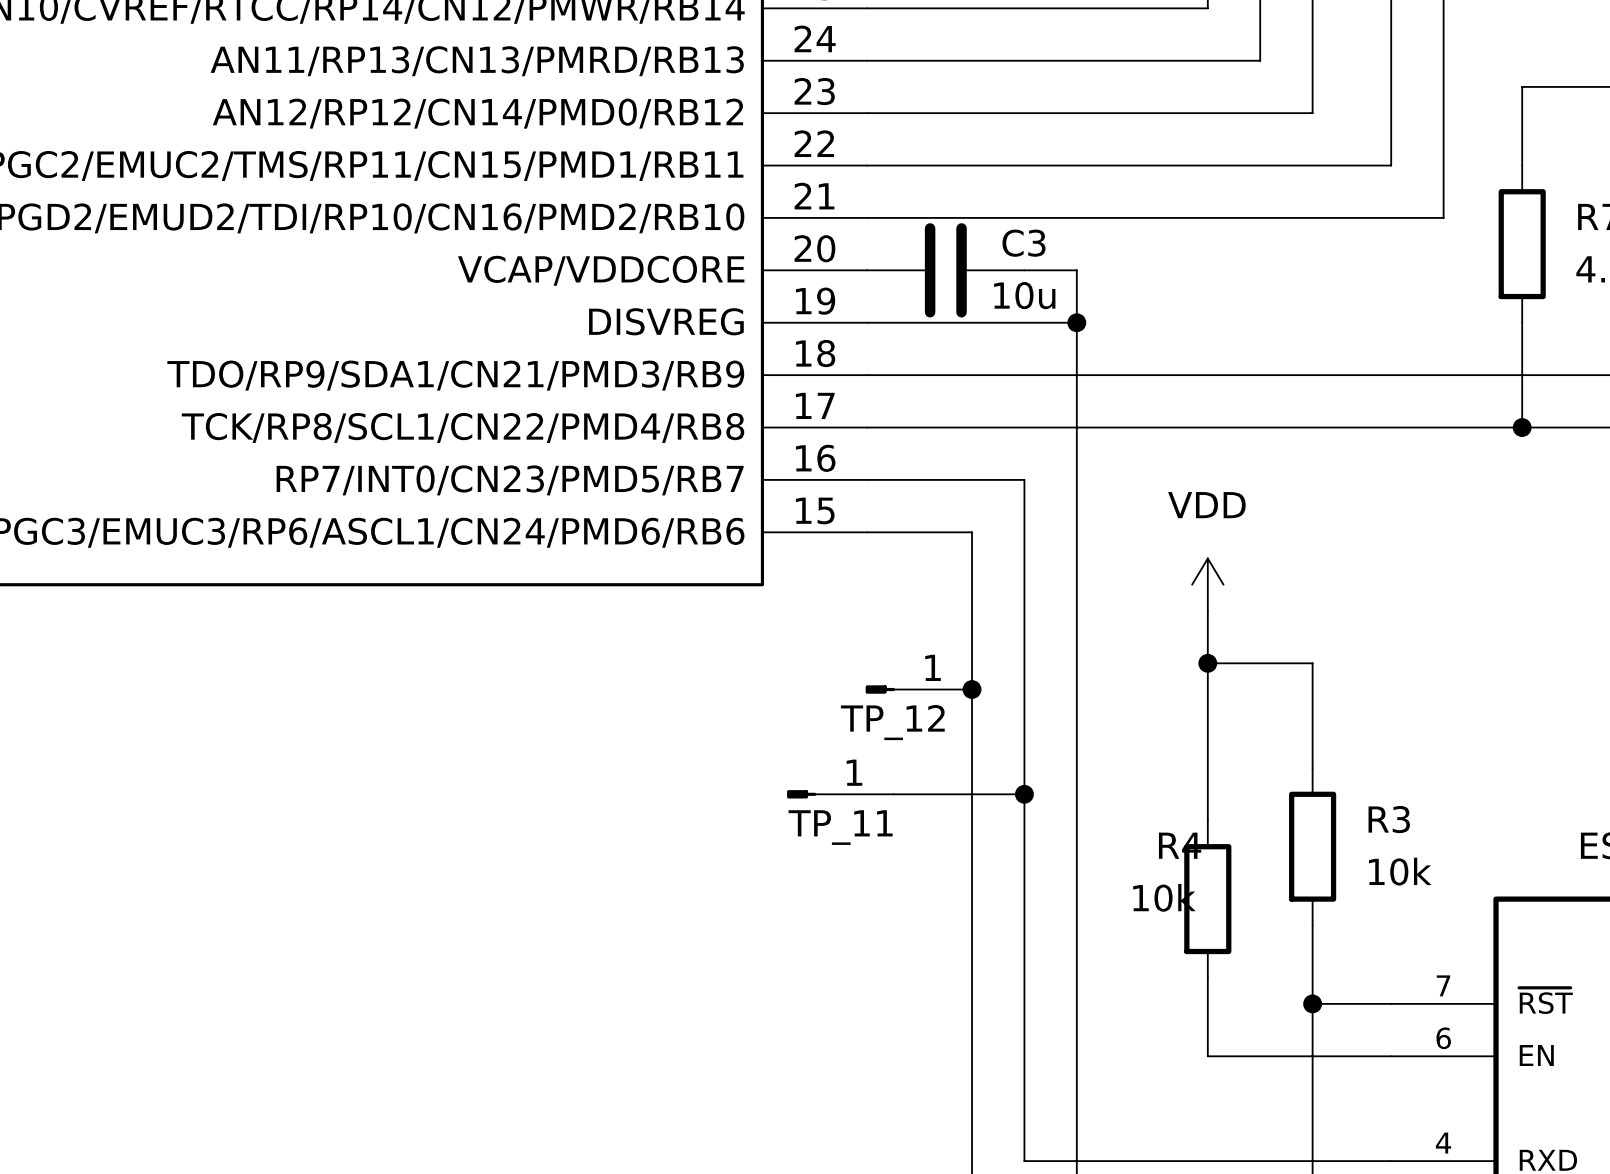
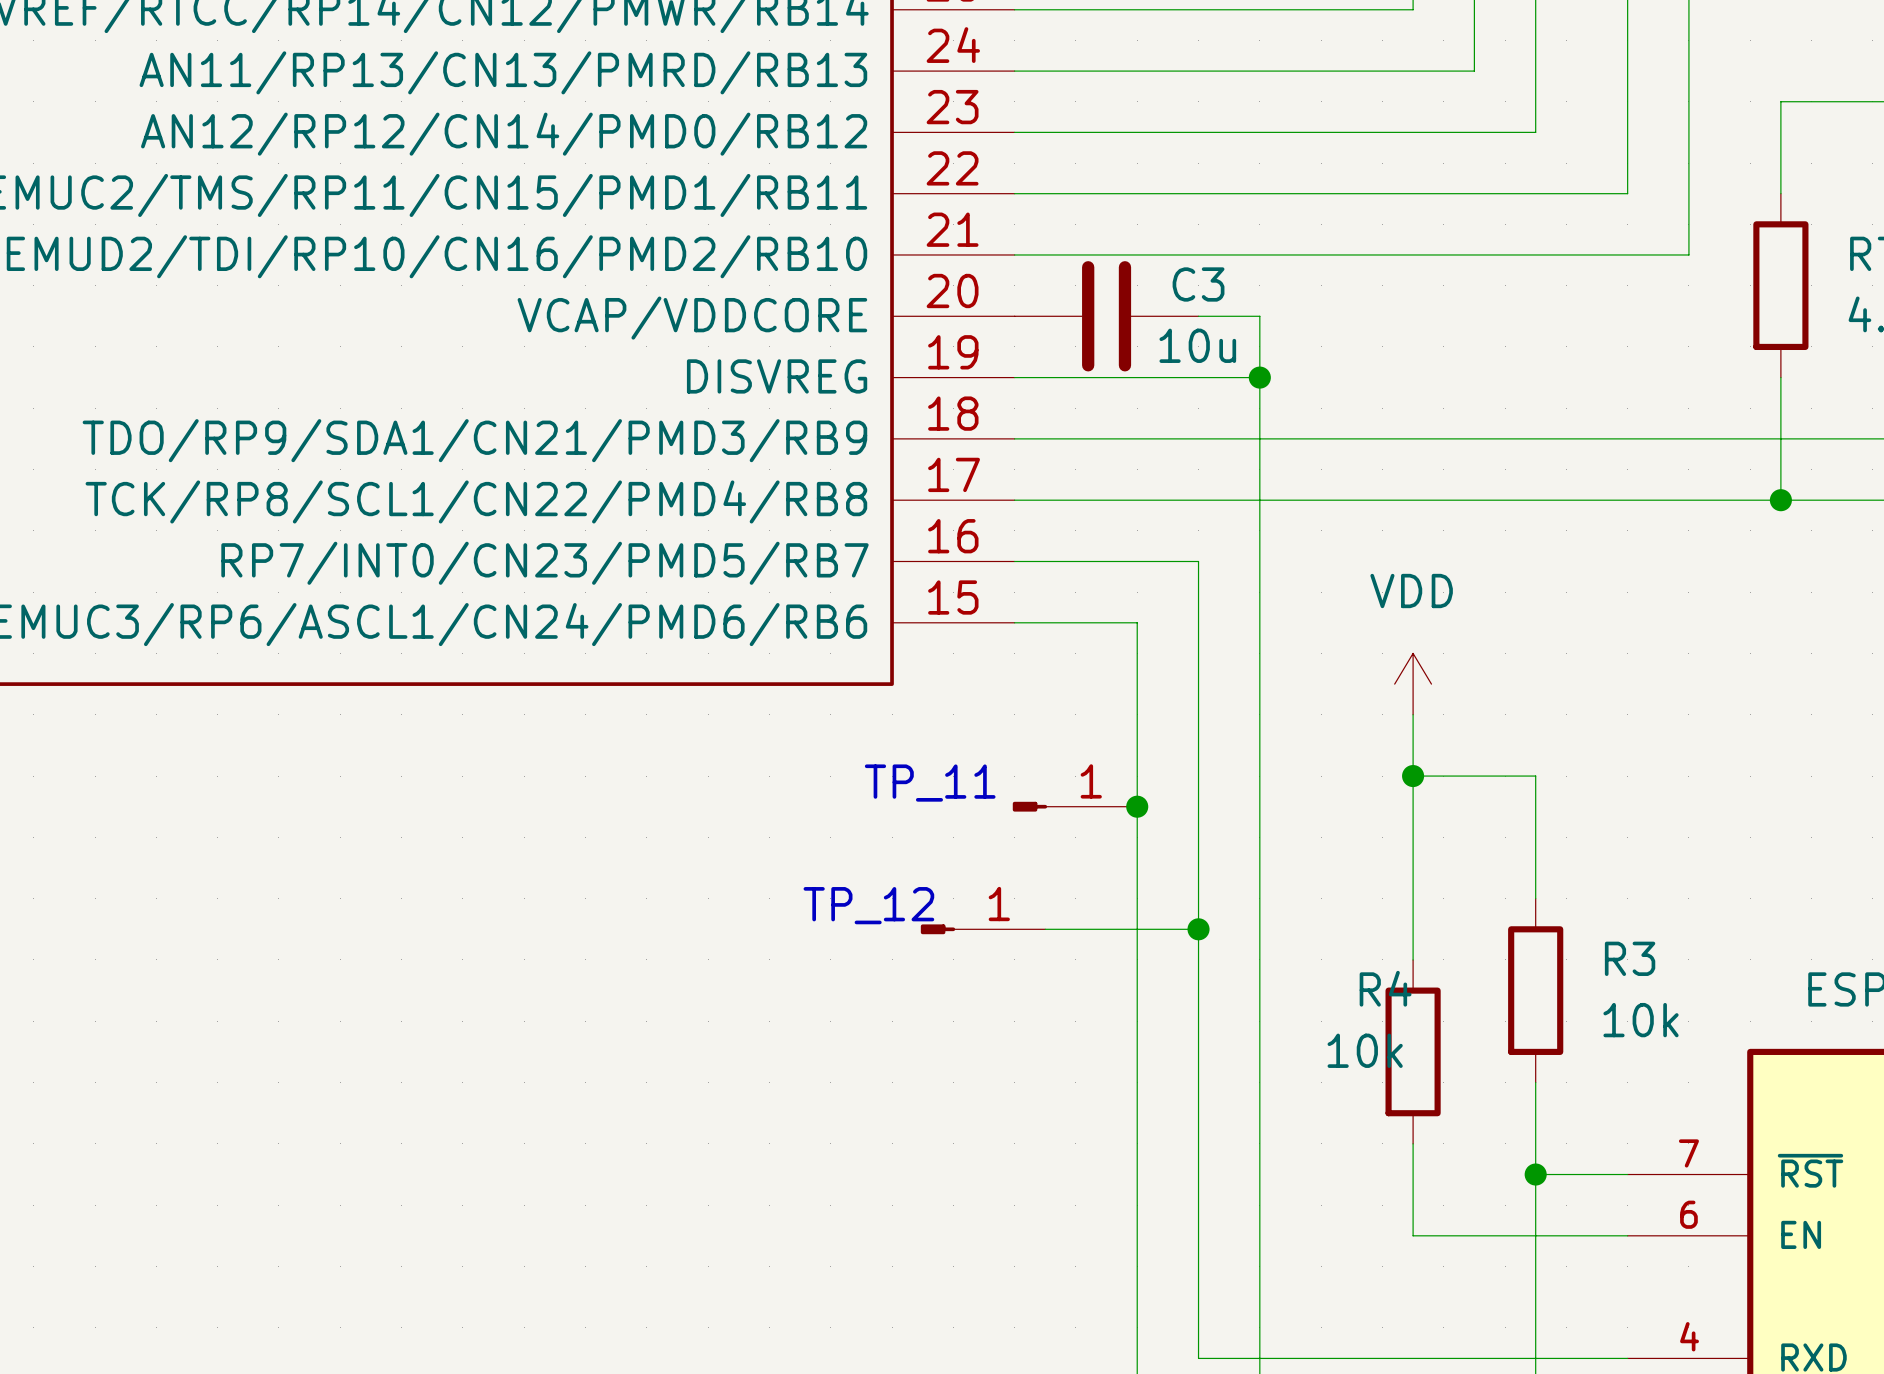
text: none -> TP_11 (930, 783)
label: TP_12 (892, 722) -> none
text: none -> TP_12 (868, 905)
label: TP_11 (840, 827) -> none

